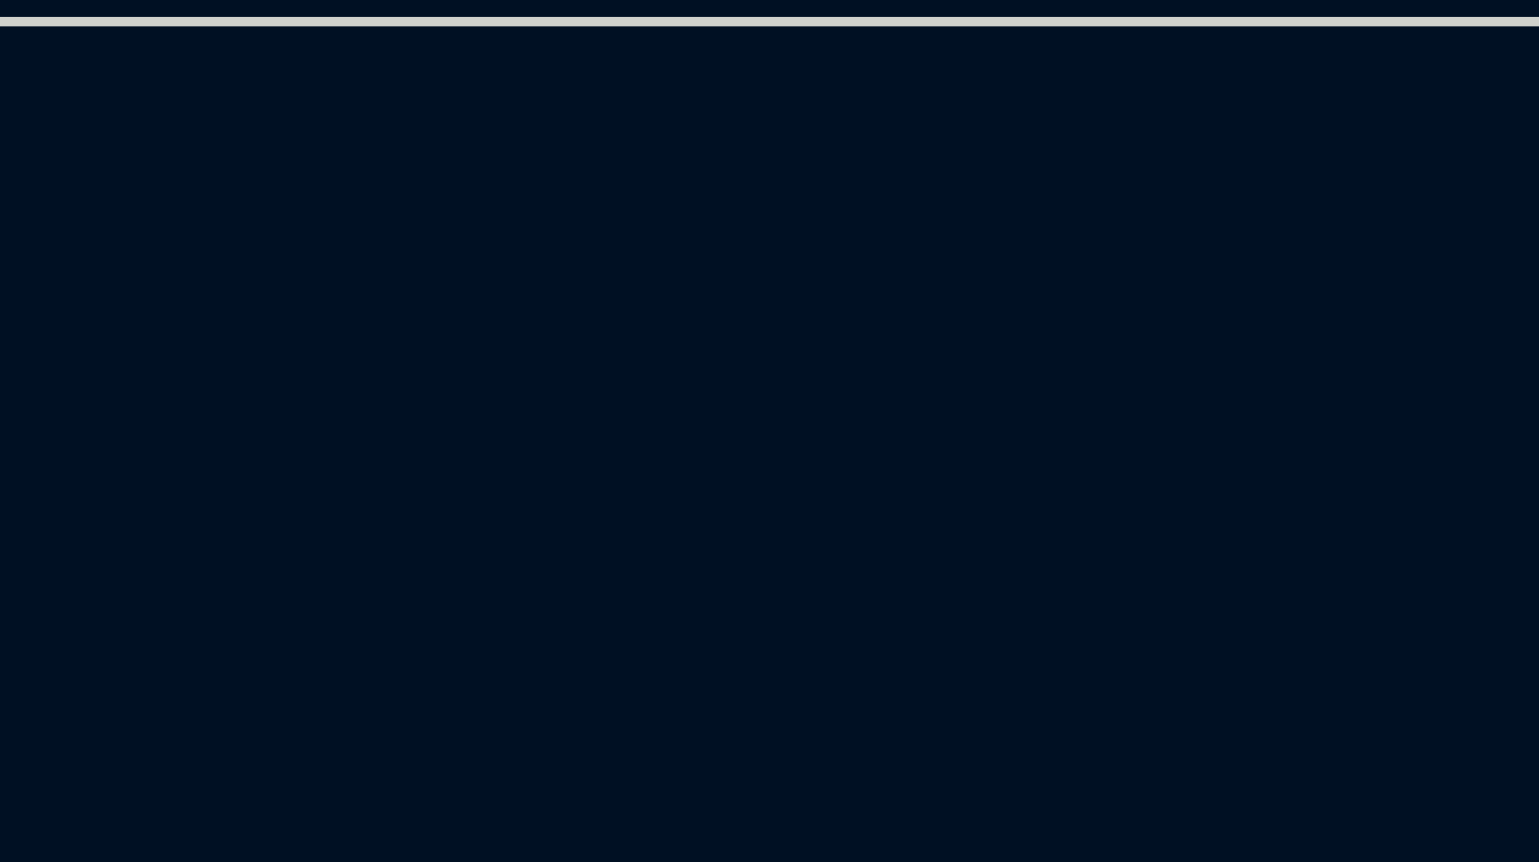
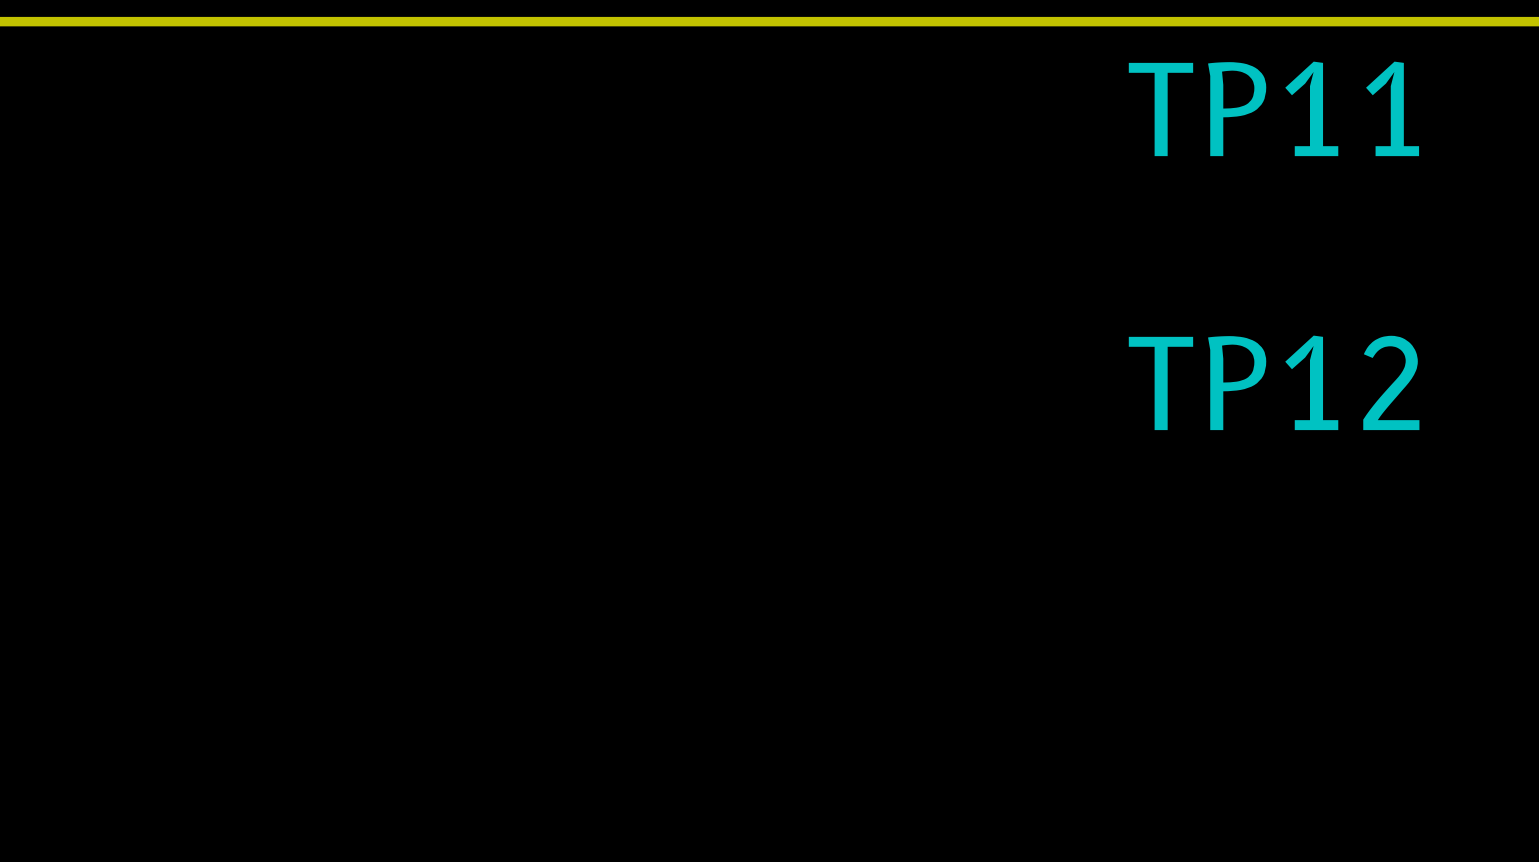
TP11: none -> (1273, 108)
TP12: none -> (1274, 382)

